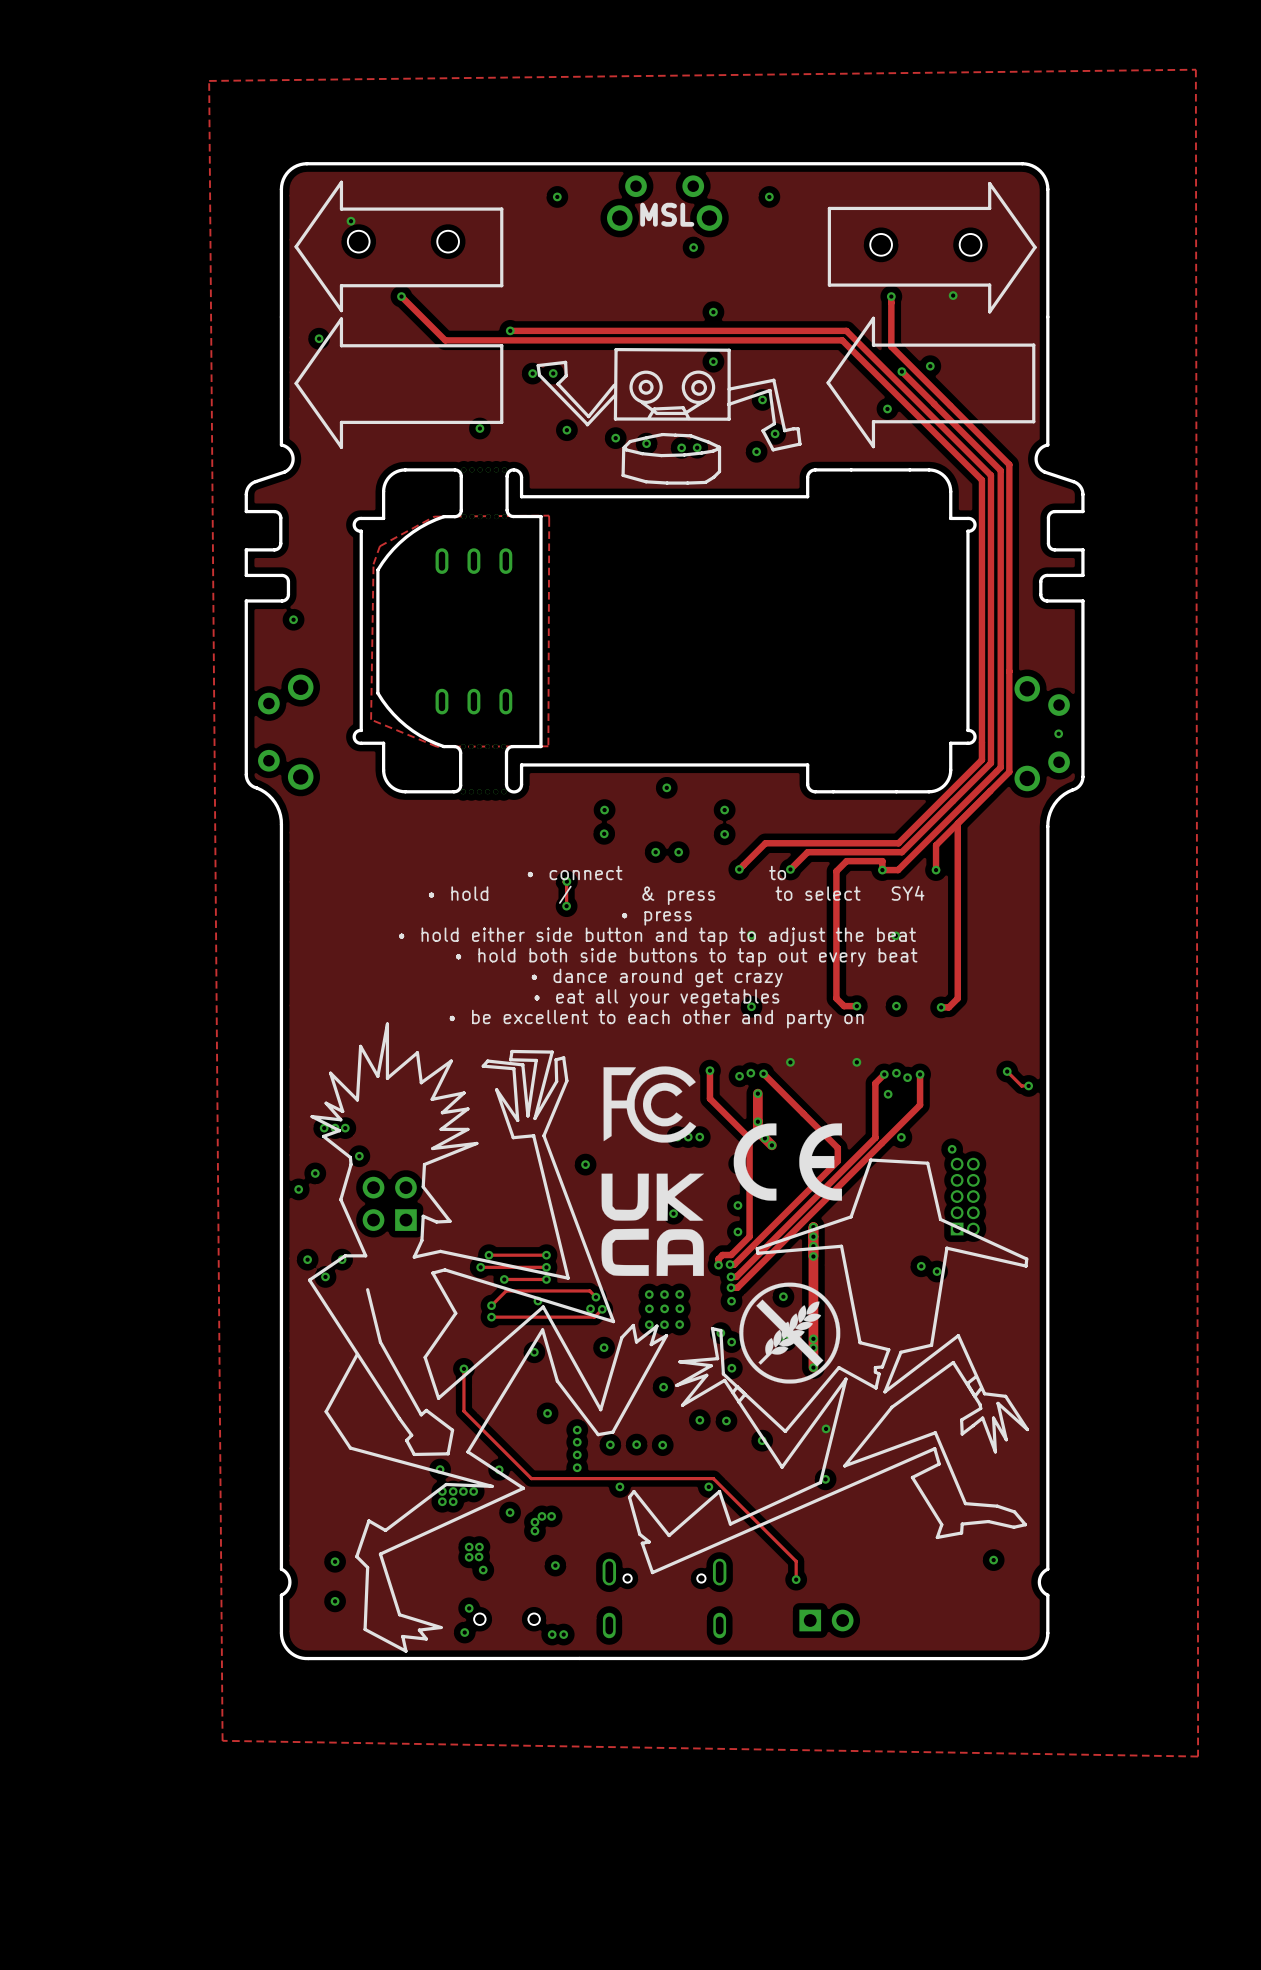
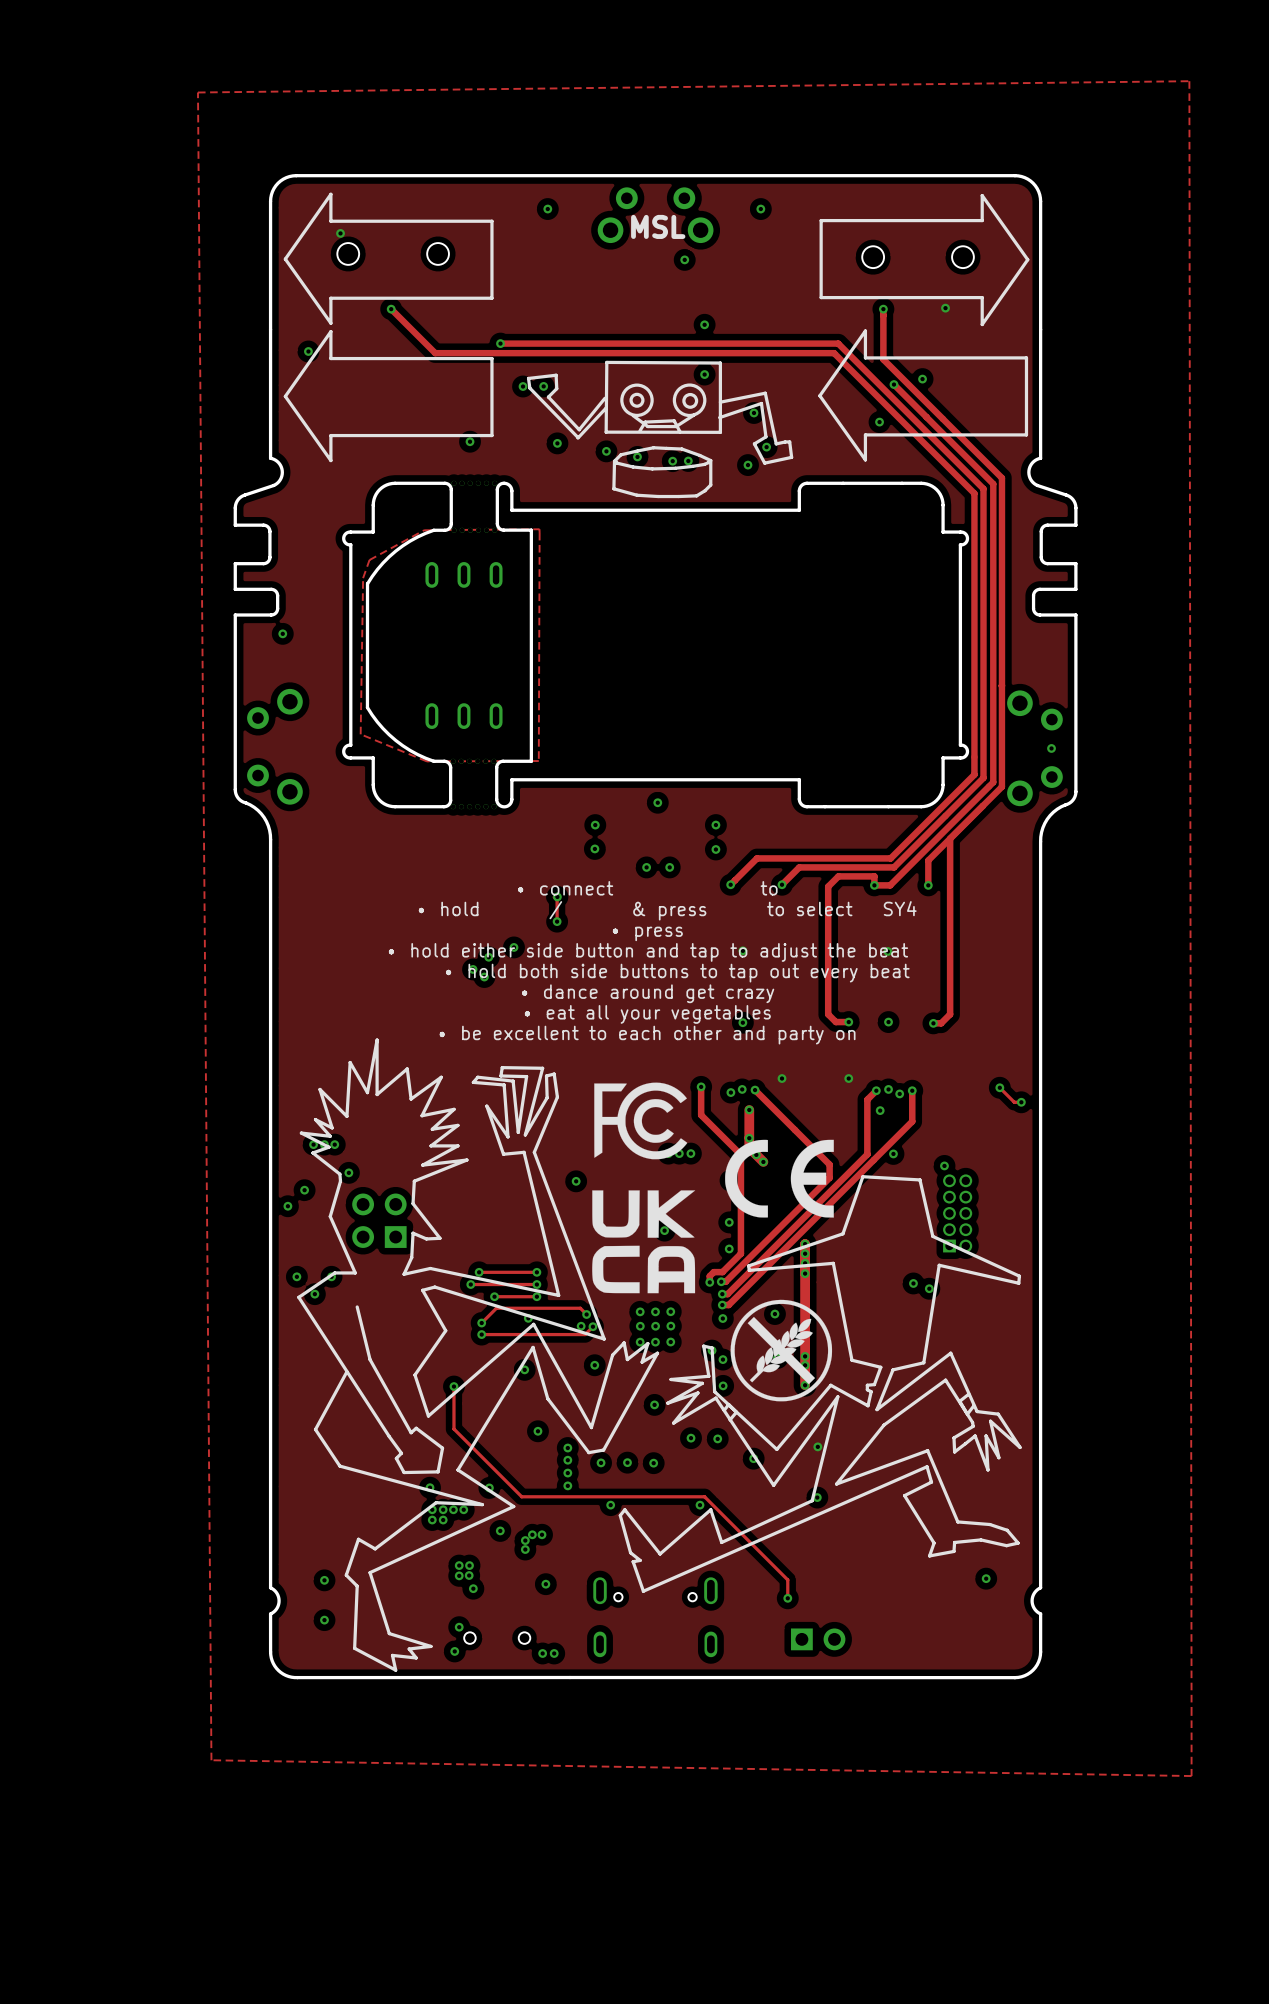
via: none -> (513, 947)
via: none -> (488, 957)
via: none -> (473, 969)
via: none -> (484, 977)

